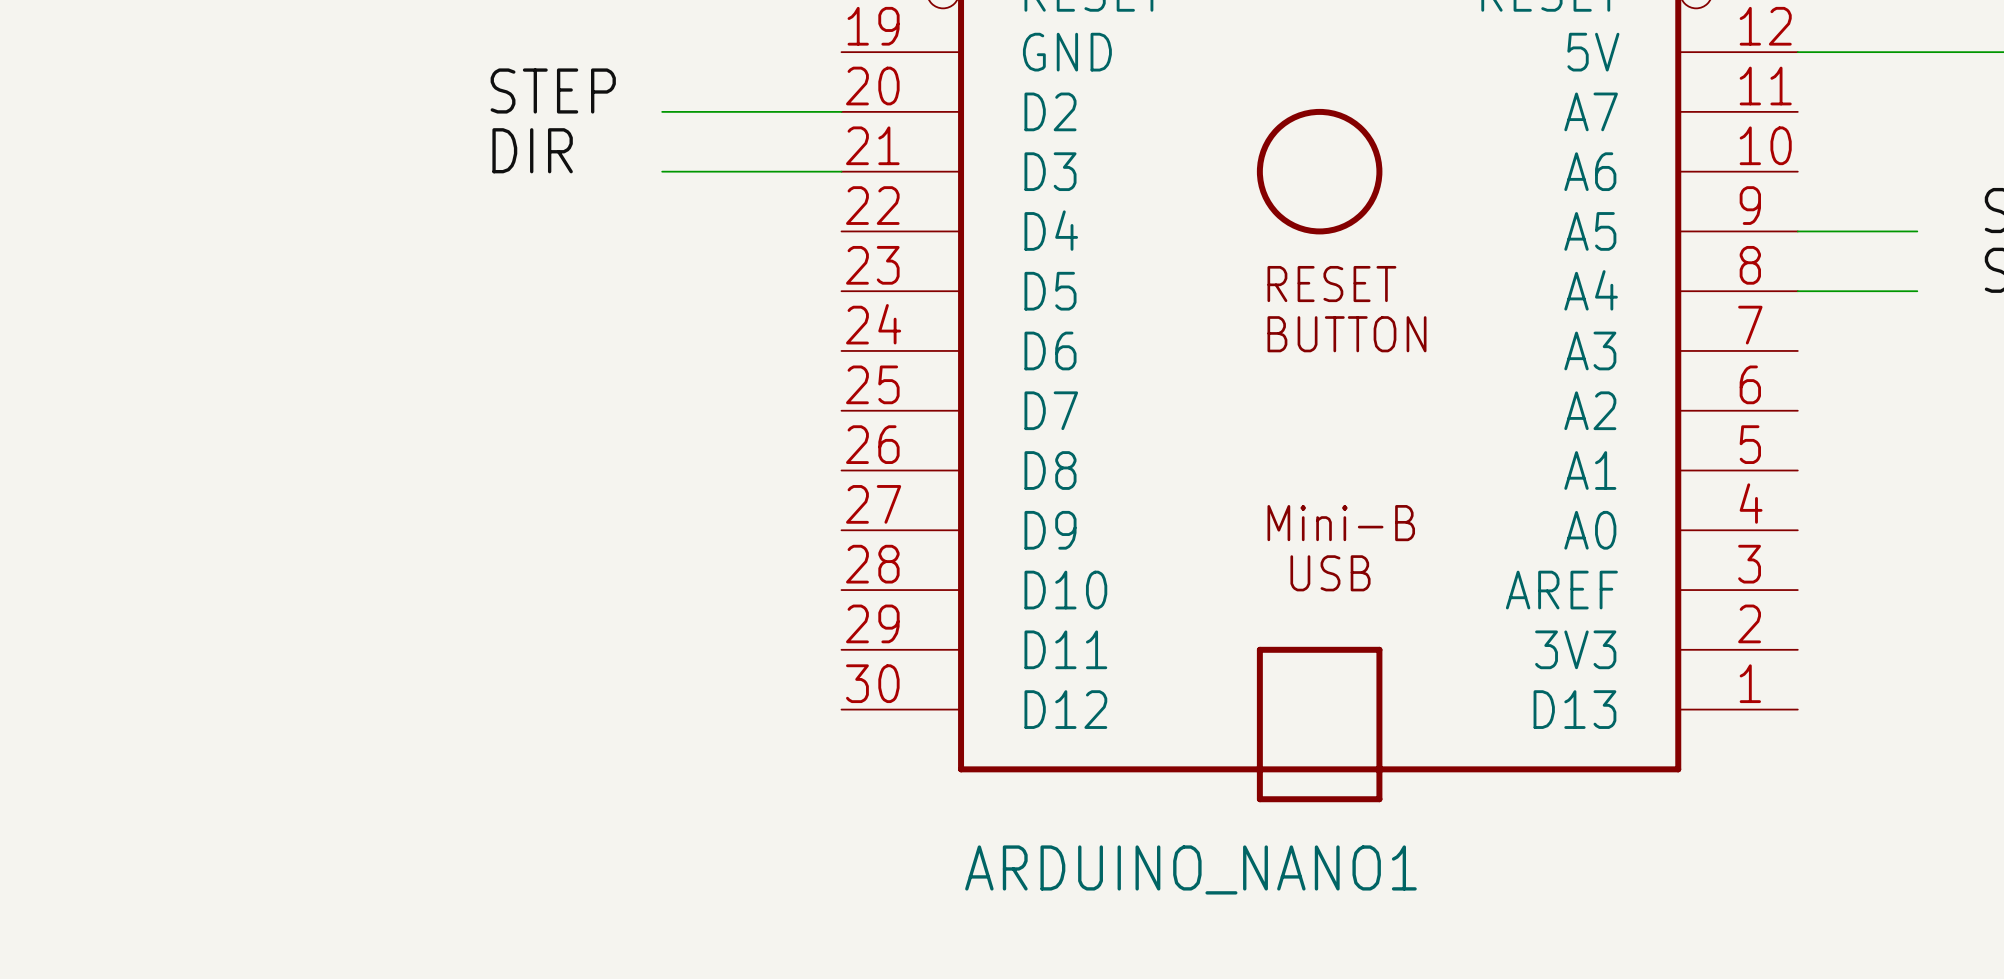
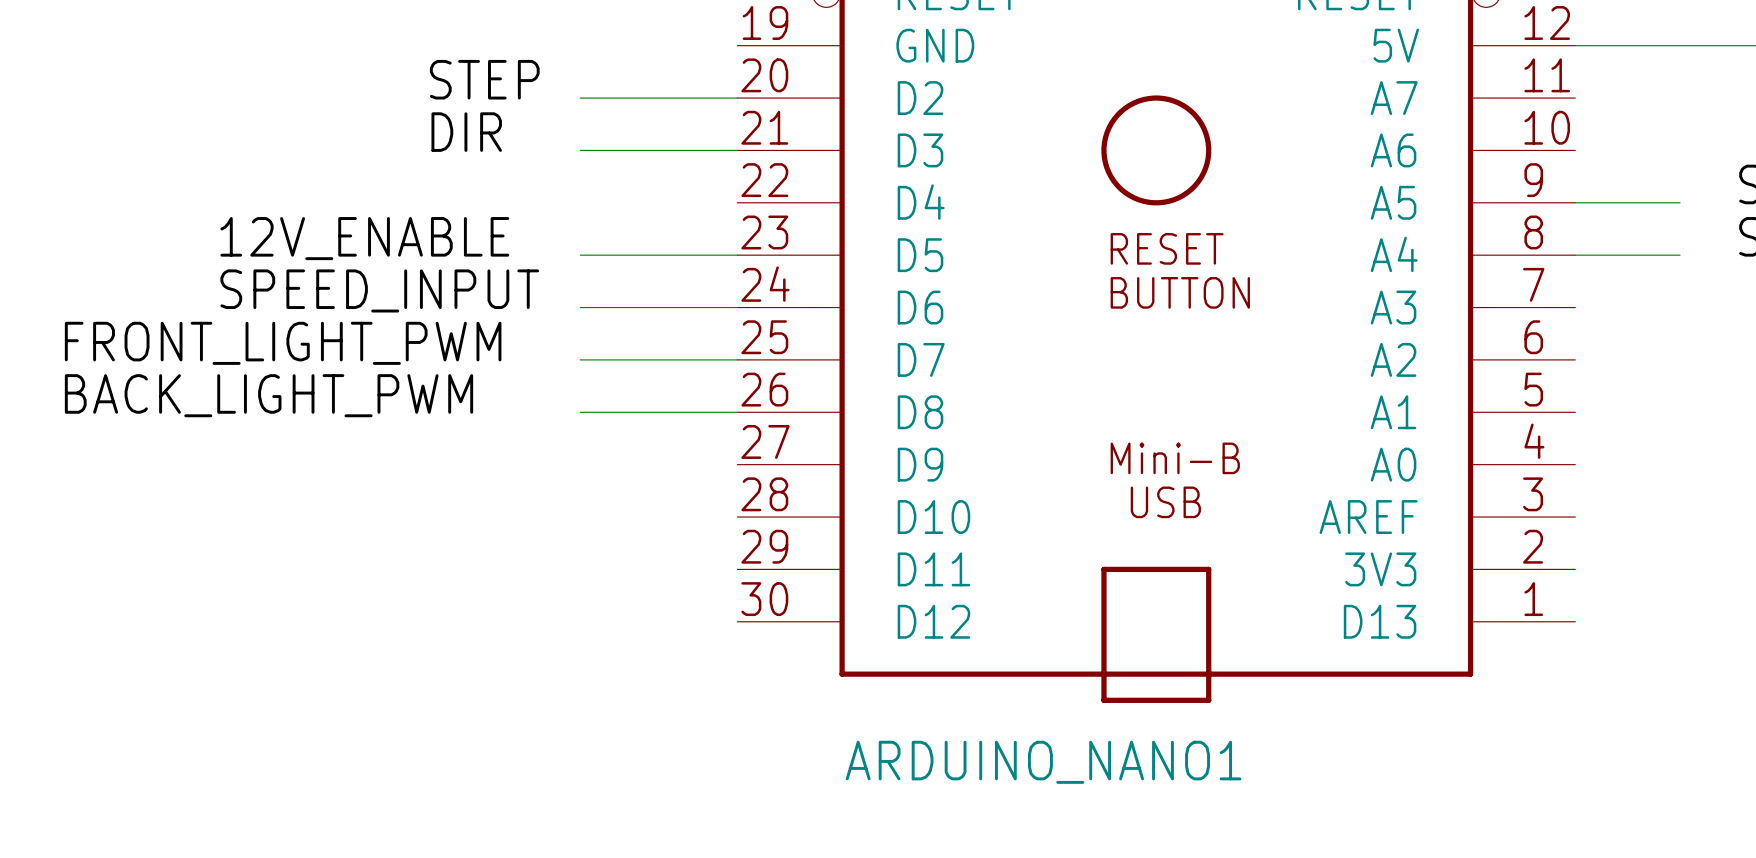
label: none -> 12V_ENABLE (364, 238)
wire: none -> (580, 255) (737, 255)
label: none -> SPEED_INPUT (379, 290)
wire: none -> (580, 307) (737, 307)
label: none -> FRONT_LIGHT_PWM (283, 343)
wire: none -> (580, 359) (737, 359)
label: none -> BACK_LIGHT_PWM (269, 395)
wire: none -> (580, 412) (737, 412)

